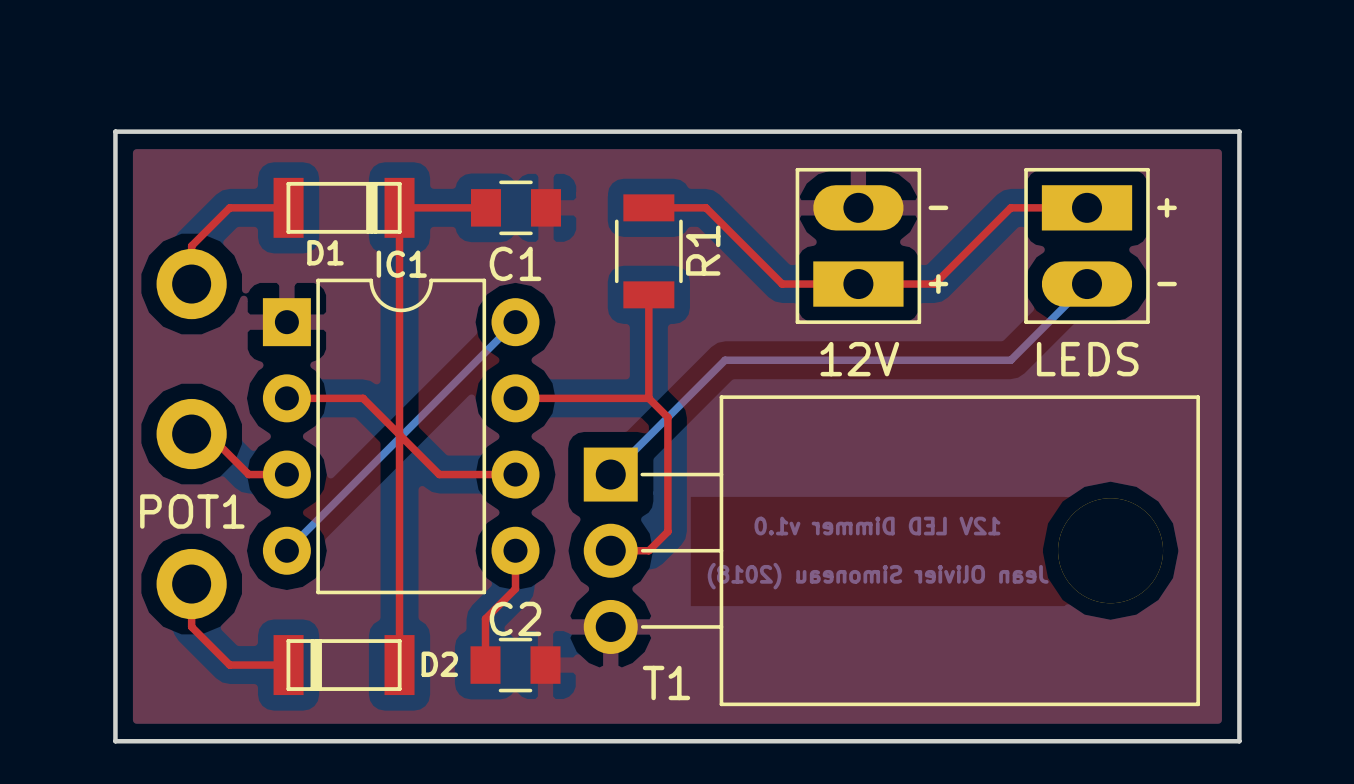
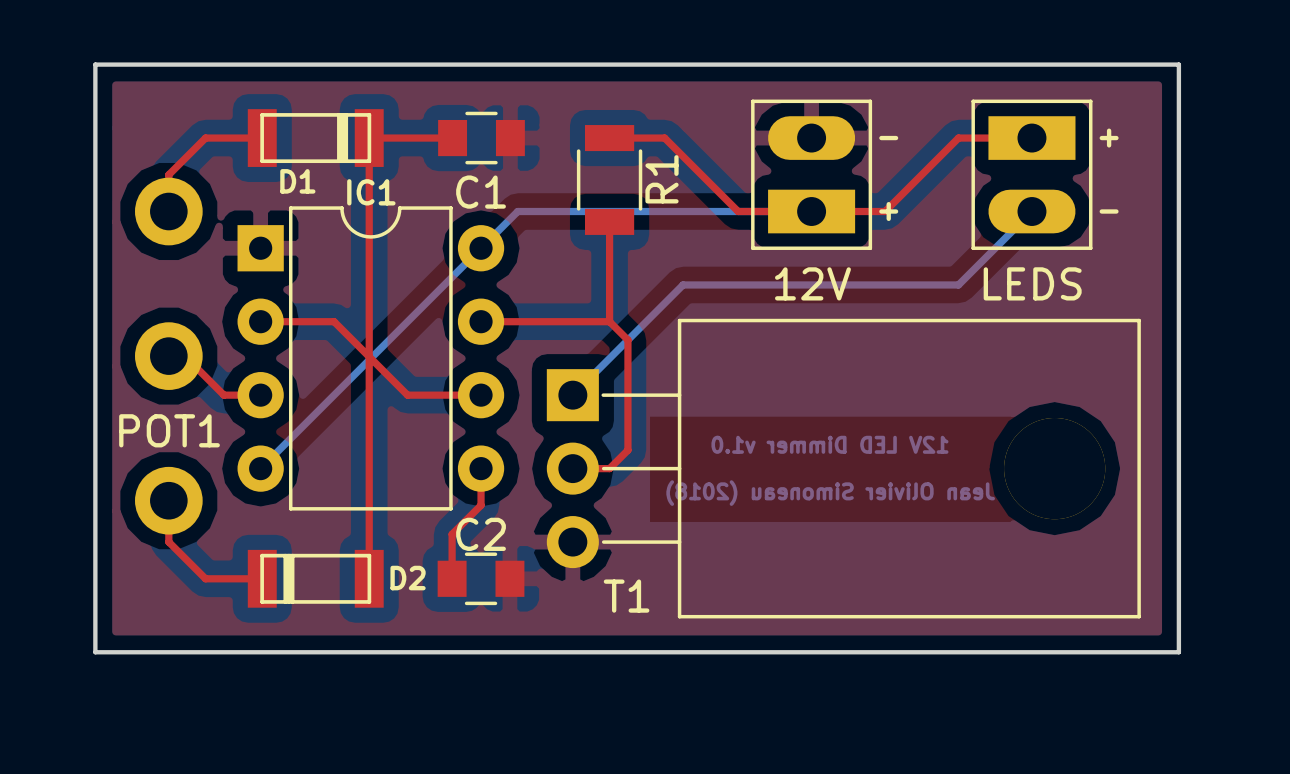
bottom track: none -> (811, 211) (517, 211) (481, 248)

